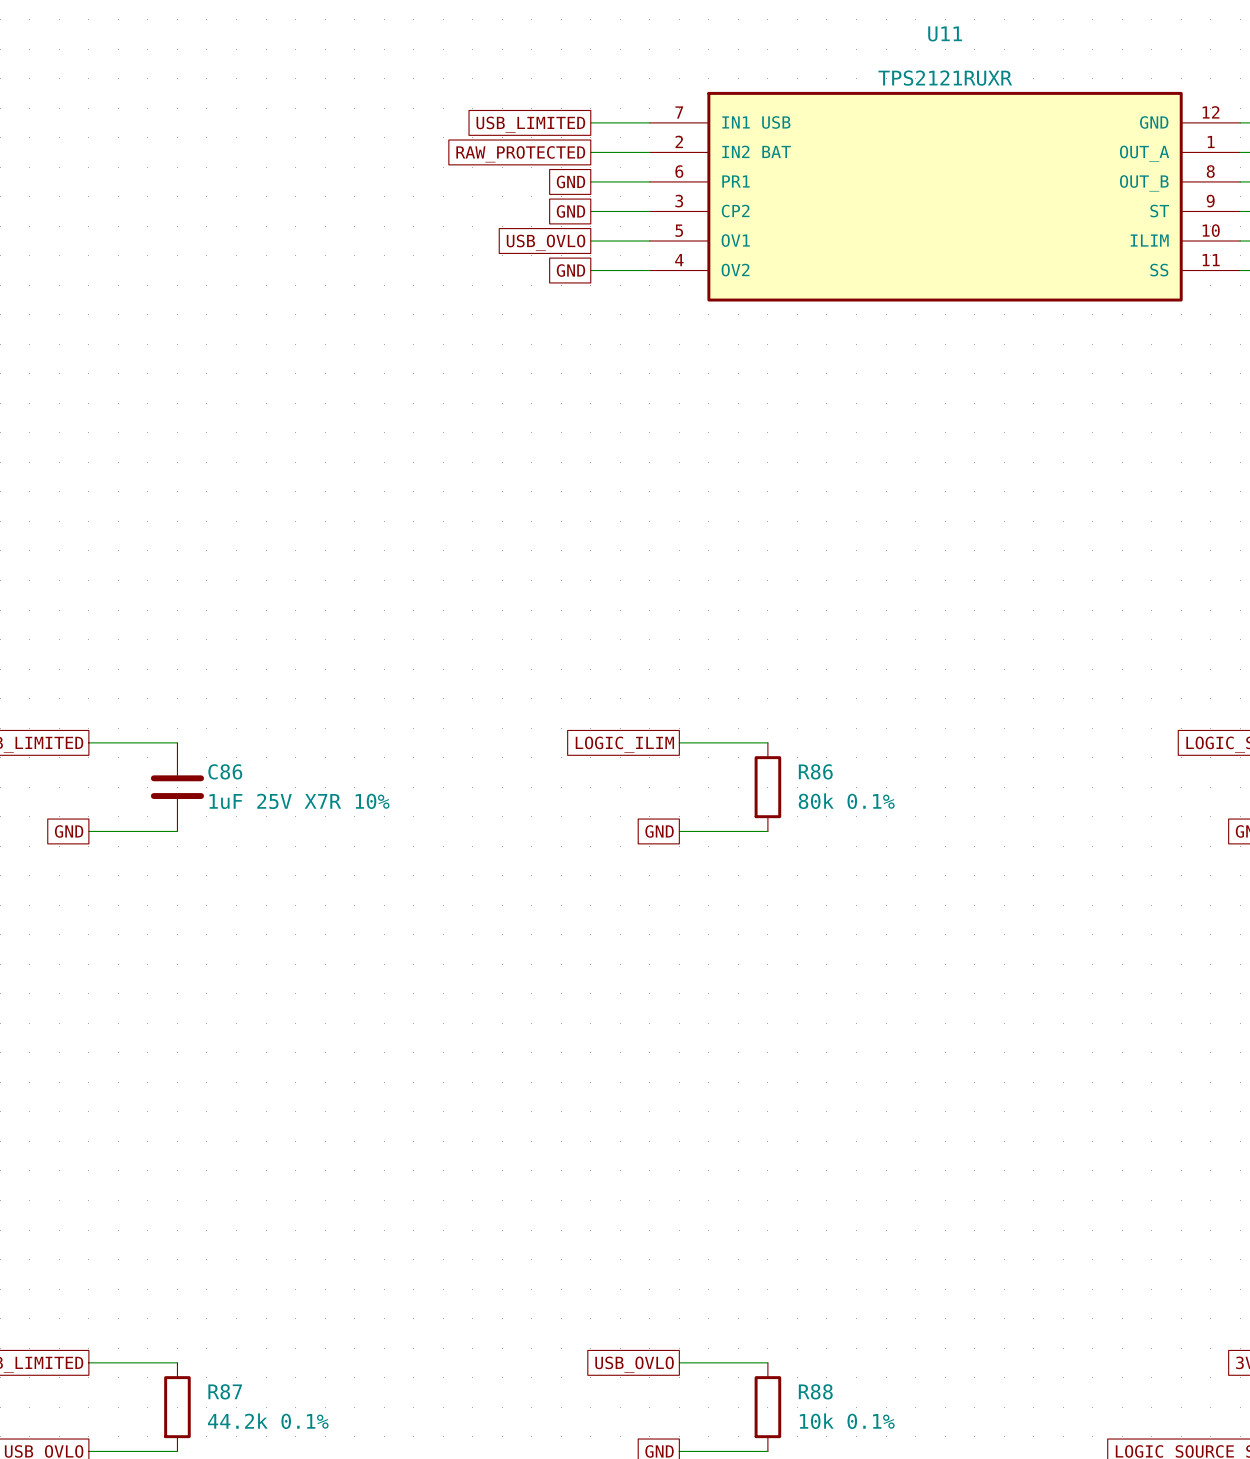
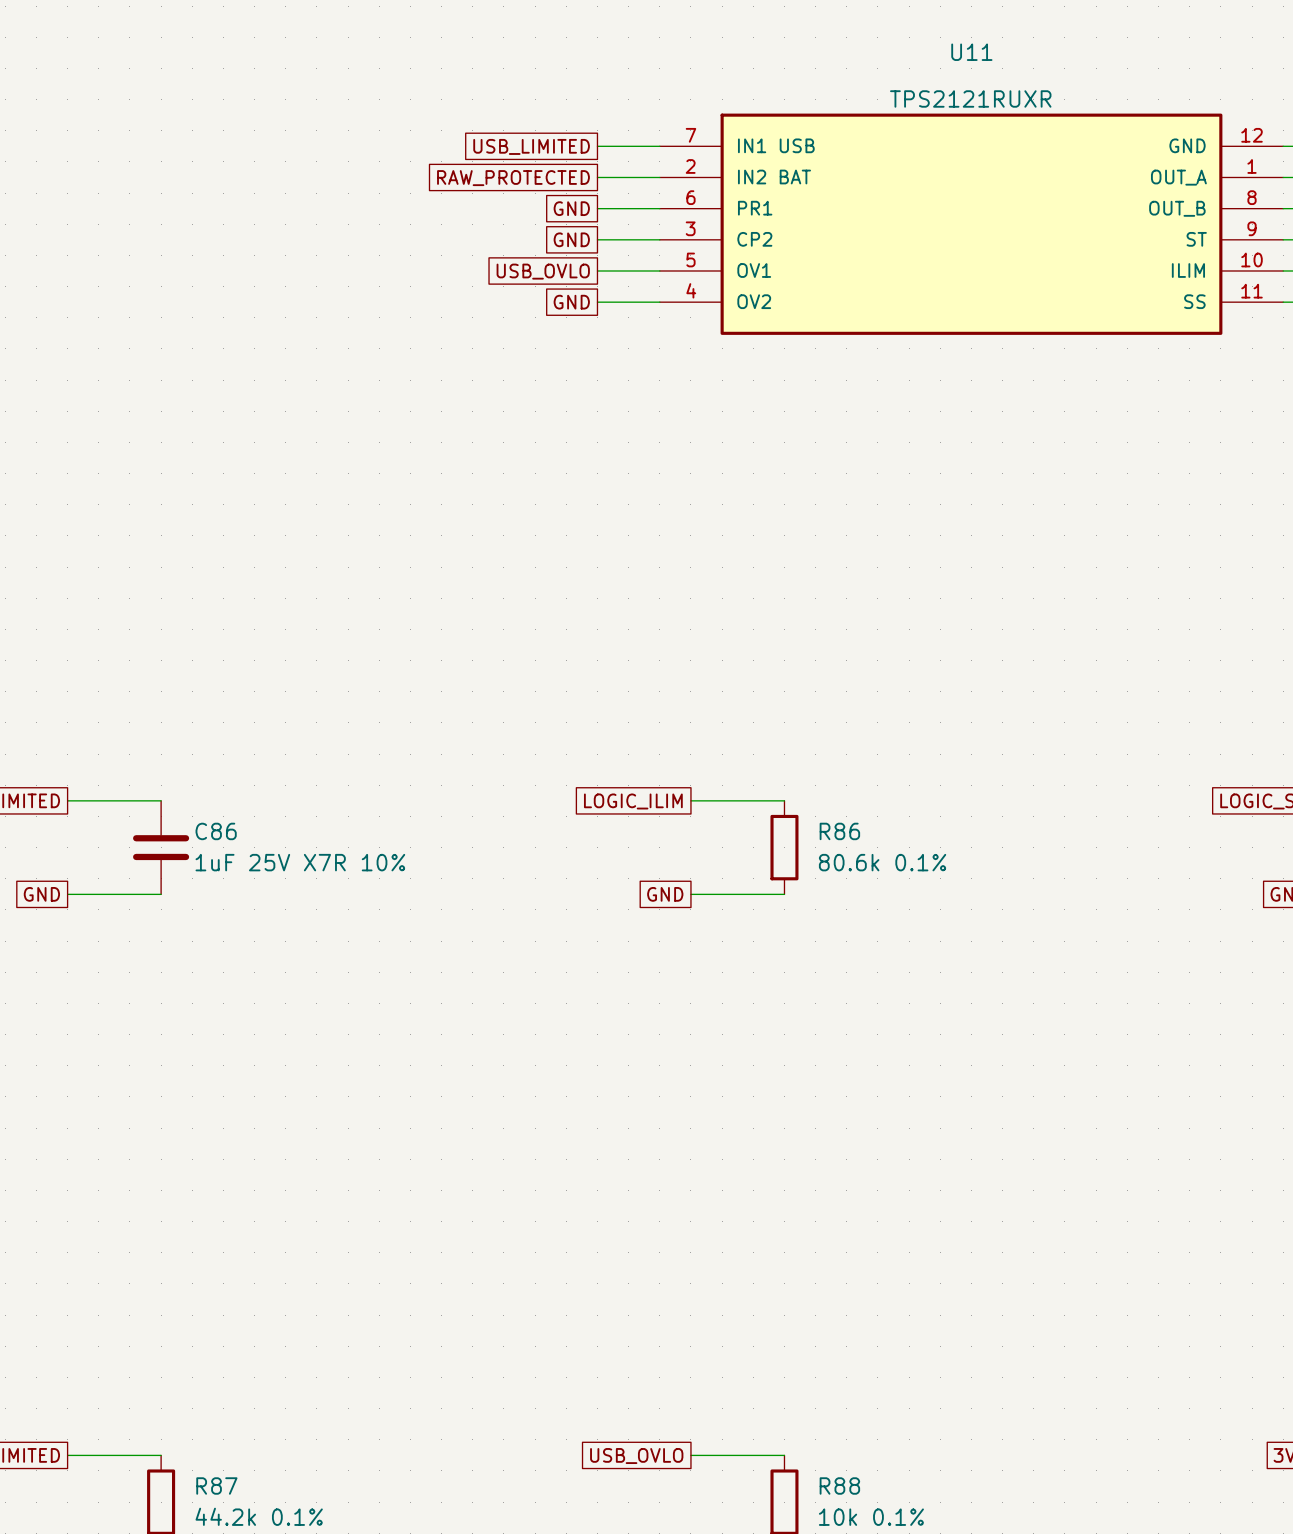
R86 value: 80k 0.1% (846, 801) -> 80.6k 0.1% (882, 862)

